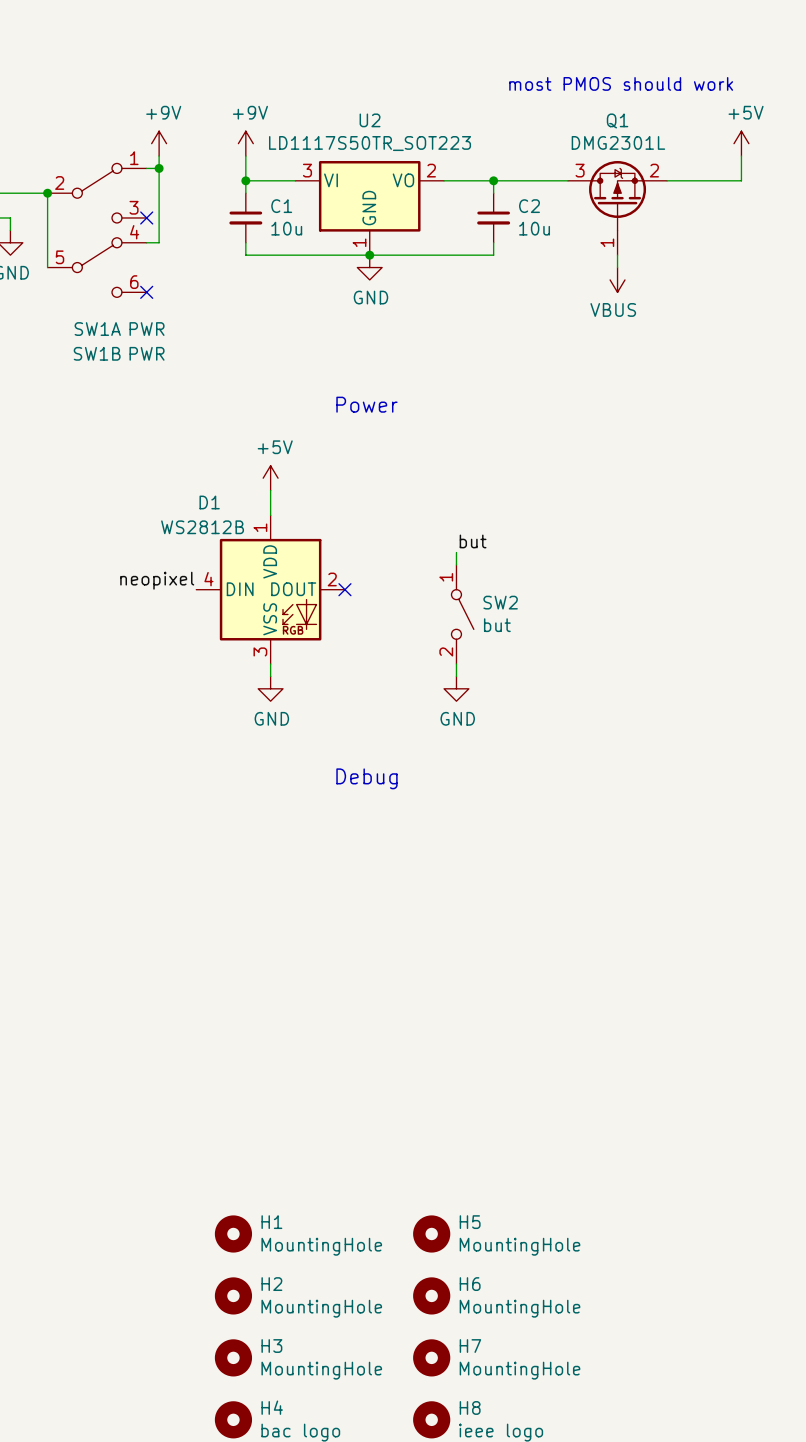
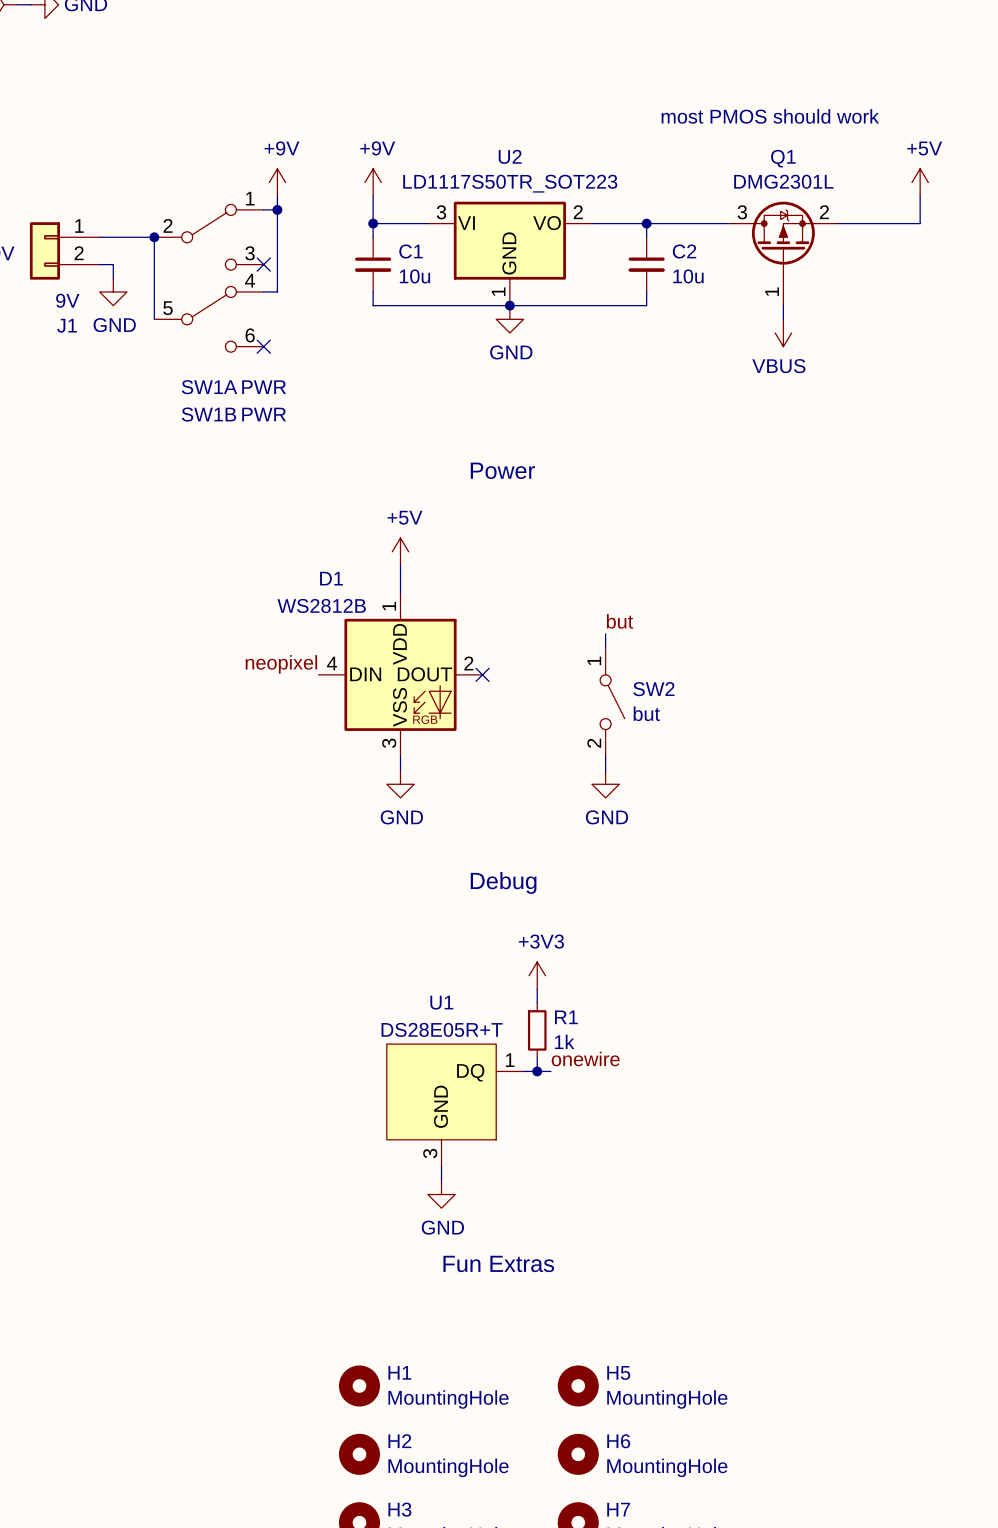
power symbol: none -> +3V3 (537, 975)
wire: none -> (537, 989) (537, 1003)
R1: none -> 1k (537, 1030)
wire: none -> (537, 1057) (537, 1071)
label: none -> onewire (585, 1058)
wire: none -> (523, 1071) (550, 1071)
junction: none -> (537, 1071)
U1: none -> DS28E05R+T (455, 1105)
wire: none -> (441, 1167) (441, 1180)
power symbol: none -> GND (441, 1194)
text: none -> Fun Extras (498, 1263)

